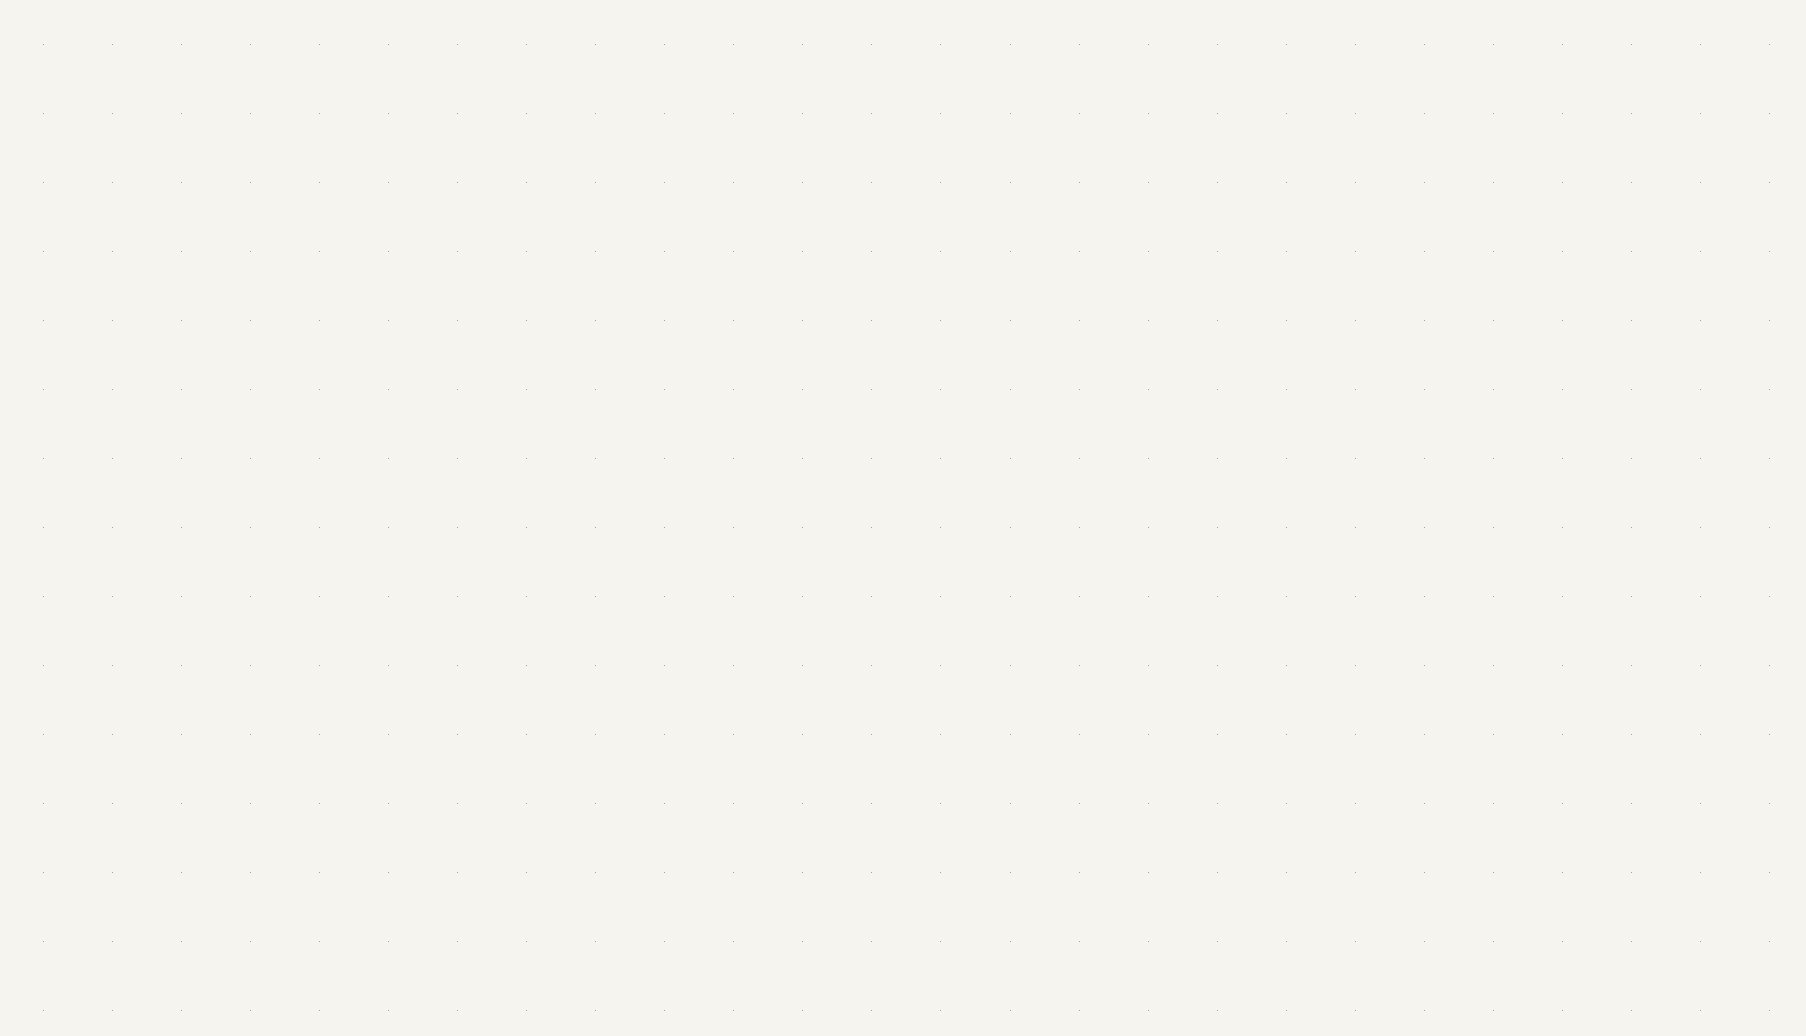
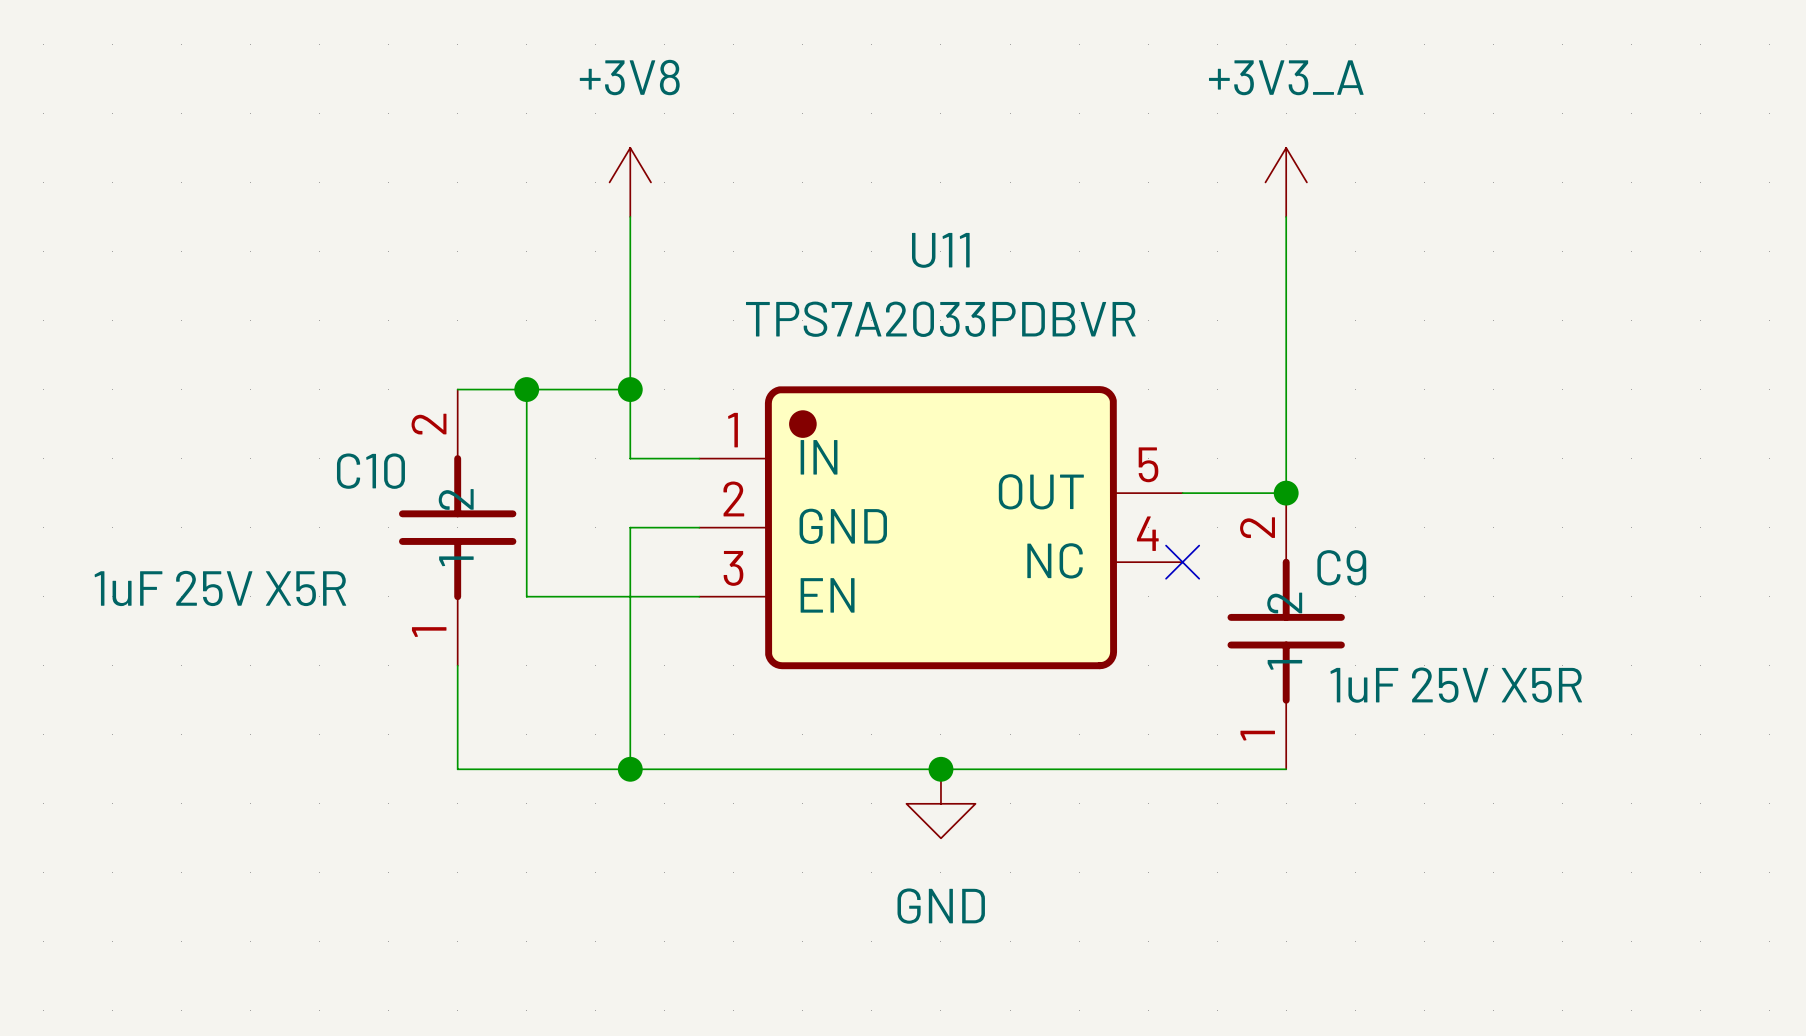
power symbol: none -> +3V8 (630, 182)
power symbol: none -> +3V3_A (1286, 182)
wire: none -> (630, 216) (630, 458) (699, 458)
wire: none -> (1286, 216) (1286, 493) (1182, 493)
wire: none -> (457, 389) (630, 389)
wire: none -> (526, 389) (526, 596) (699, 596)
junction: none -> (526, 389)
junction: none -> (630, 389)
junction: none -> (1286, 493)
C10: none -> 1uF 25V X5R (457, 527)
wire: none -> (699, 527) (630, 527) (630, 769)
U11: none -> TPS7A2033PDBVR (940, 527)
no-connect mark: none -> (1182, 562)
C9: none -> 1uF 25V X5R (1286, 631)
wire: none -> (457, 665) (457, 769) (1286, 769)
junction: none -> (630, 769)
junction: none -> (940, 769)
power symbol: none -> GND (940, 803)

